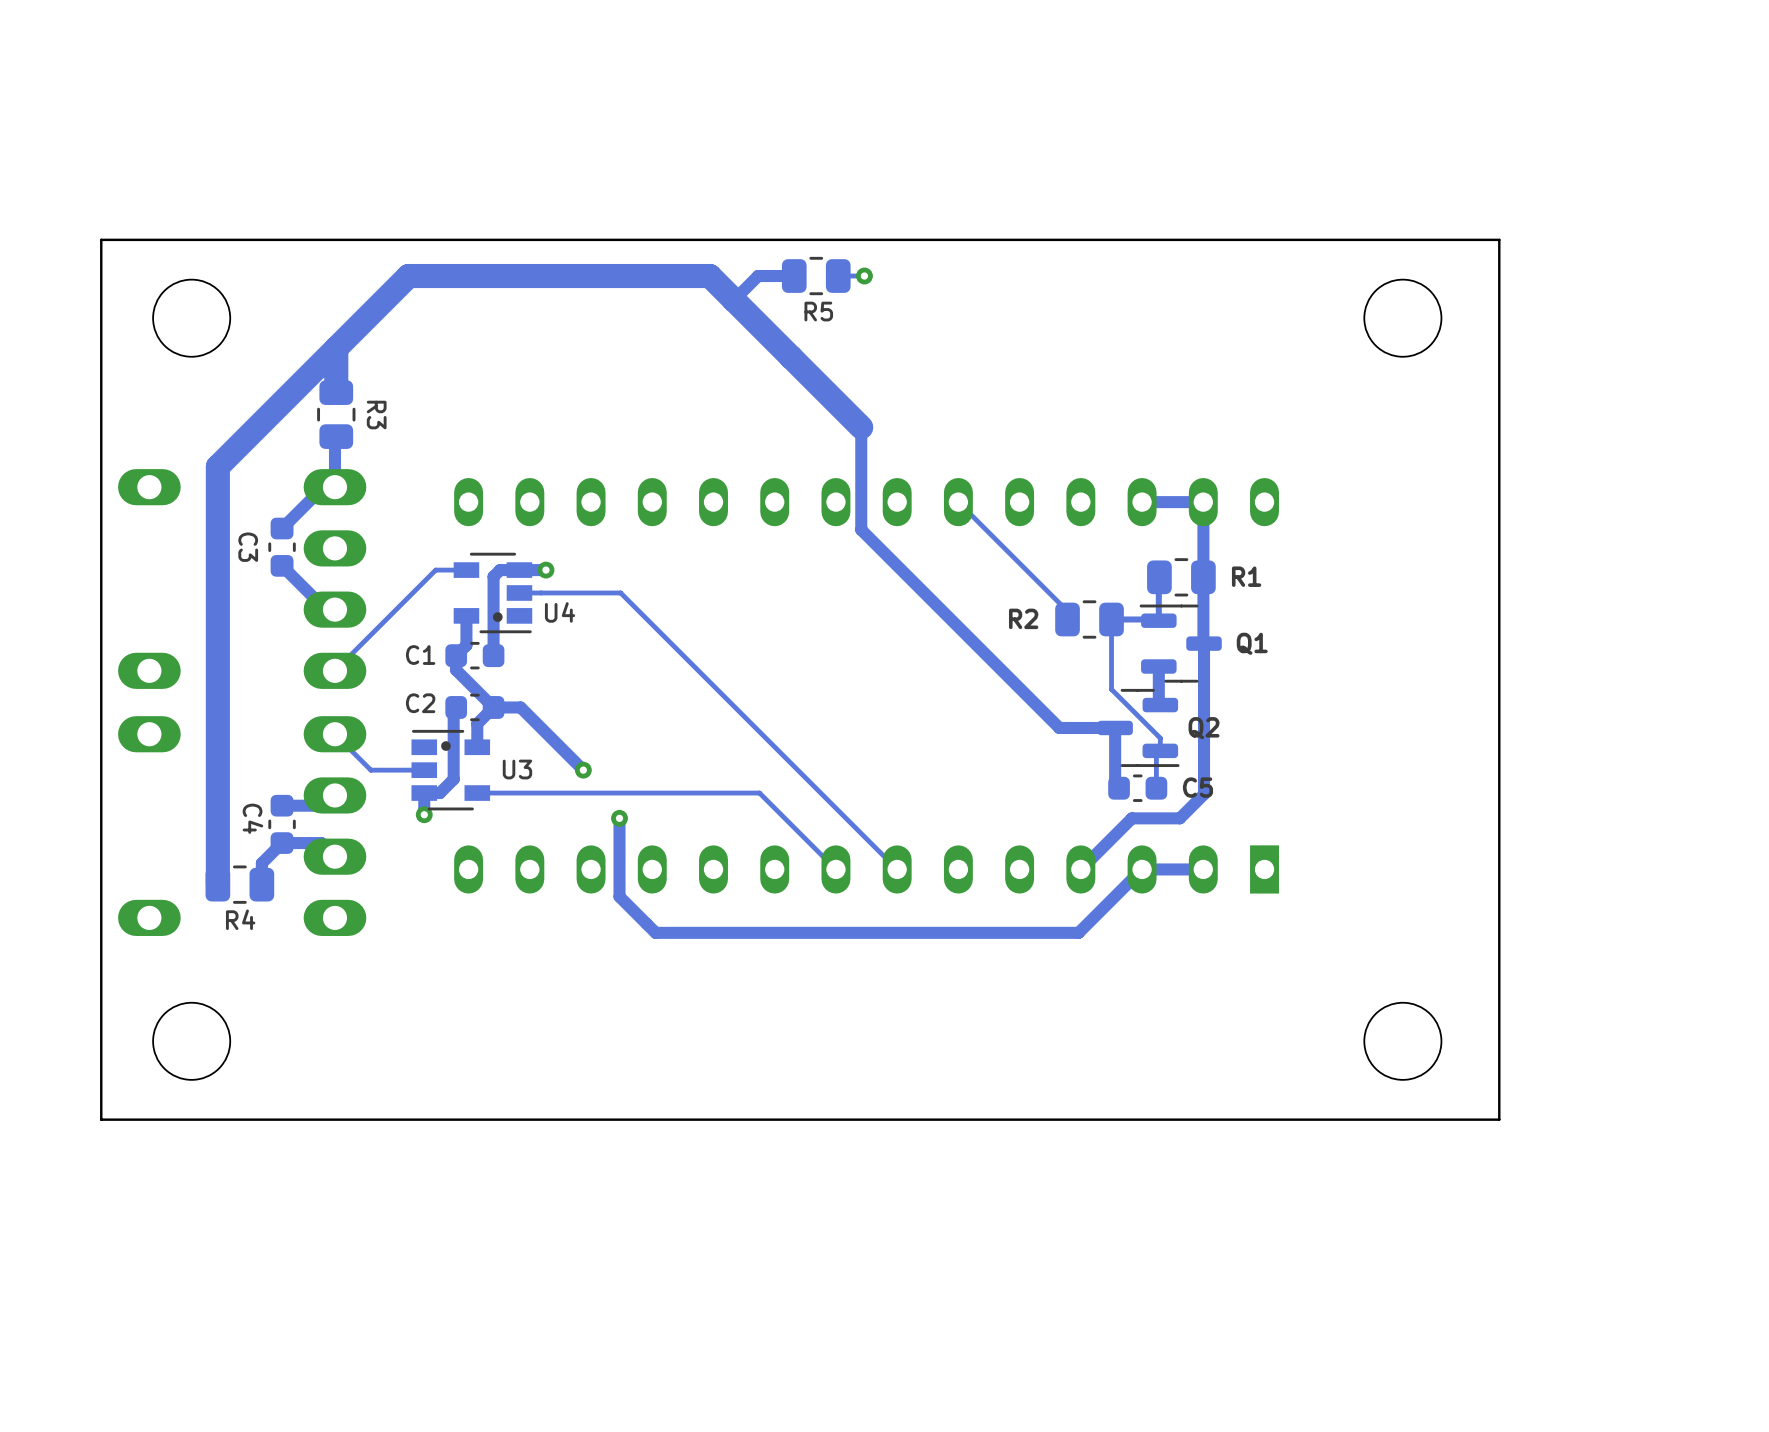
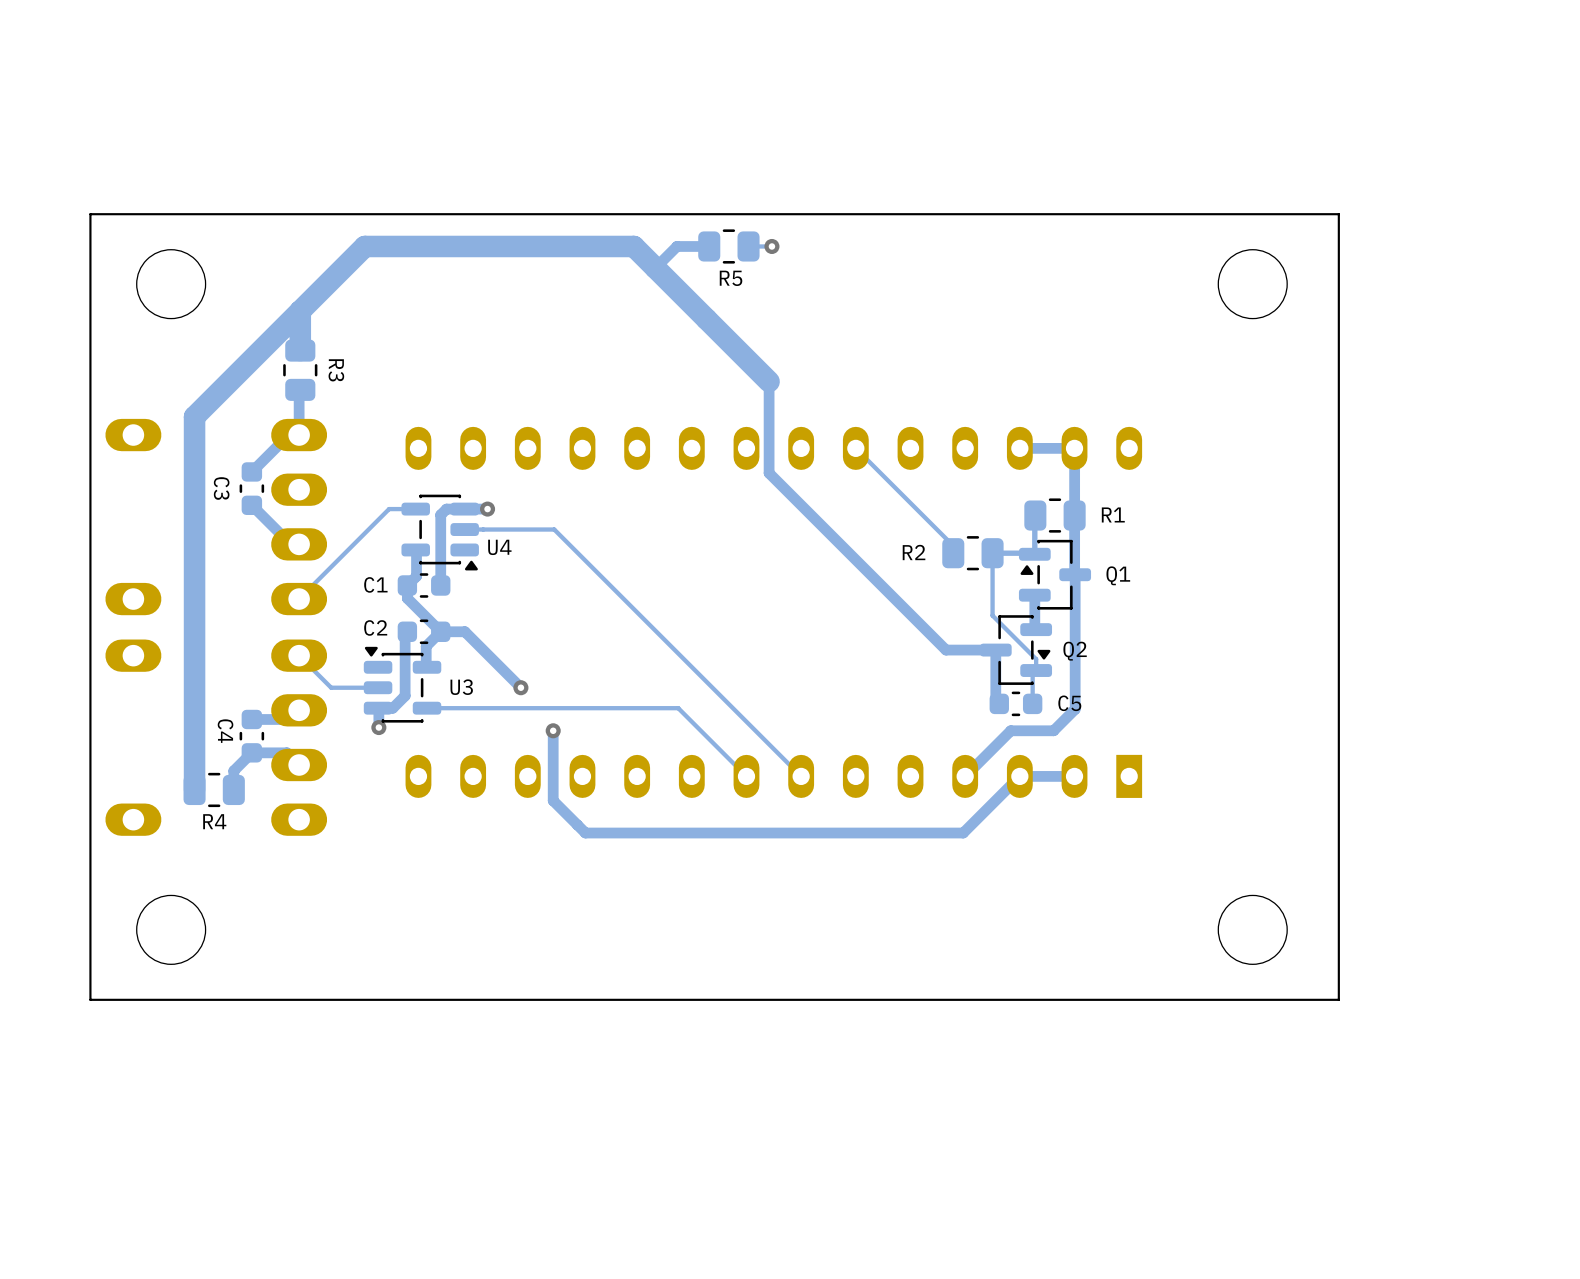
U4 footprint: [453, 552, 533, 634] -> [401, 494, 479, 571]
Q1 footprint: [1139, 604, 1222, 683] -> [1018, 539, 1092, 610]
Q2 footprint: [1097, 688, 1180, 768] -> [979, 615, 1053, 685]
U3 footprint: [411, 729, 491, 811] -> [363, 646, 442, 723]

